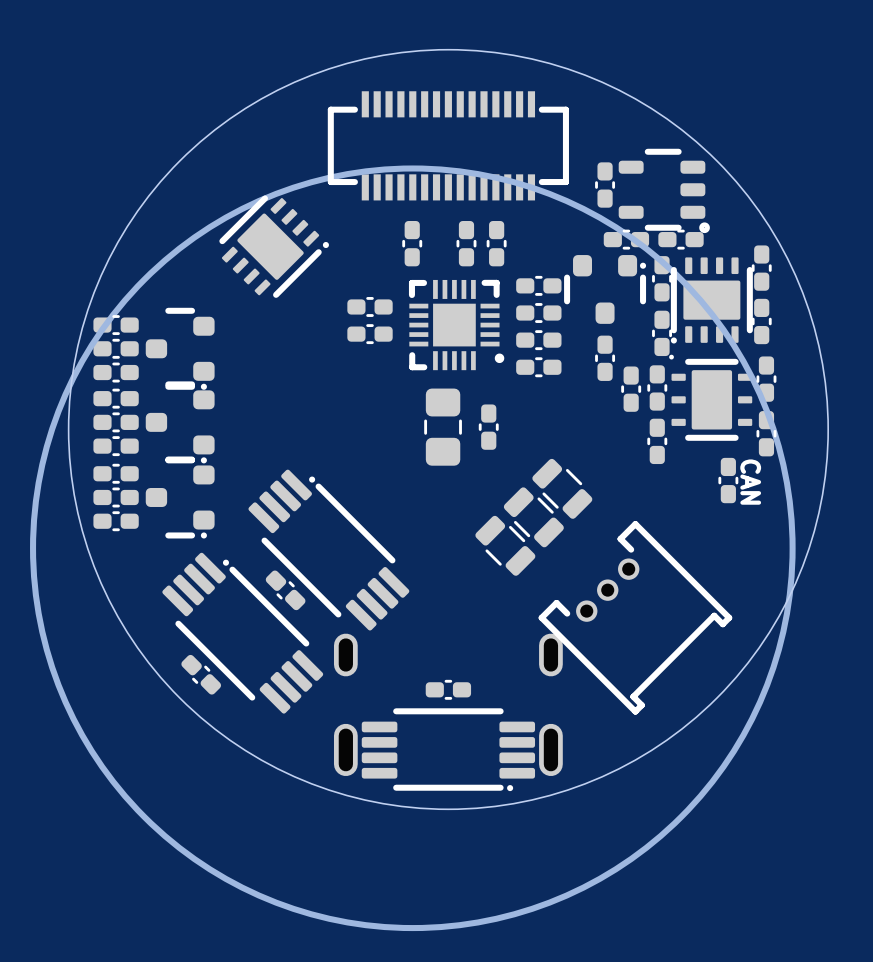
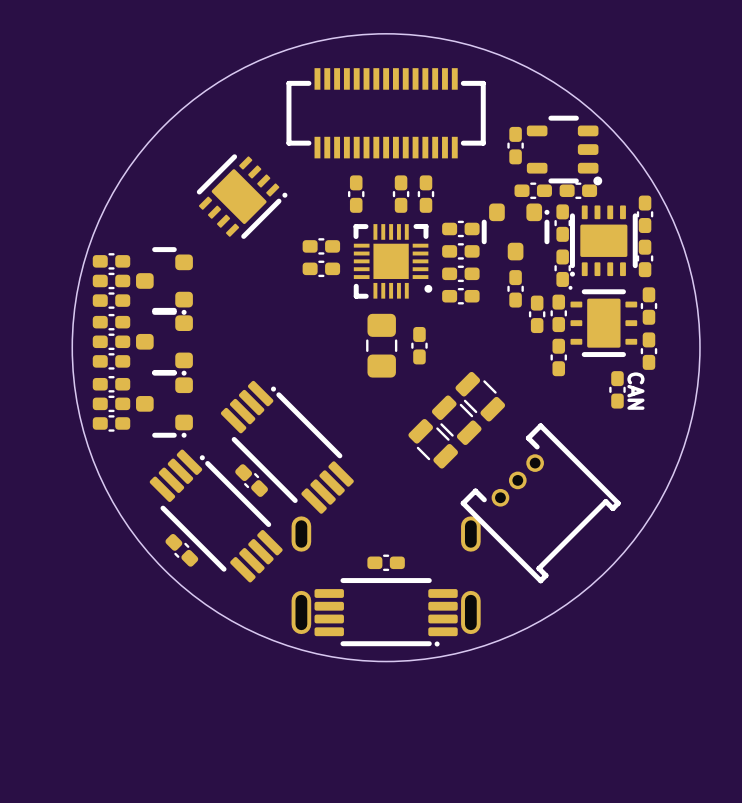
drawing: [30, 165, 796, 932] -> none

